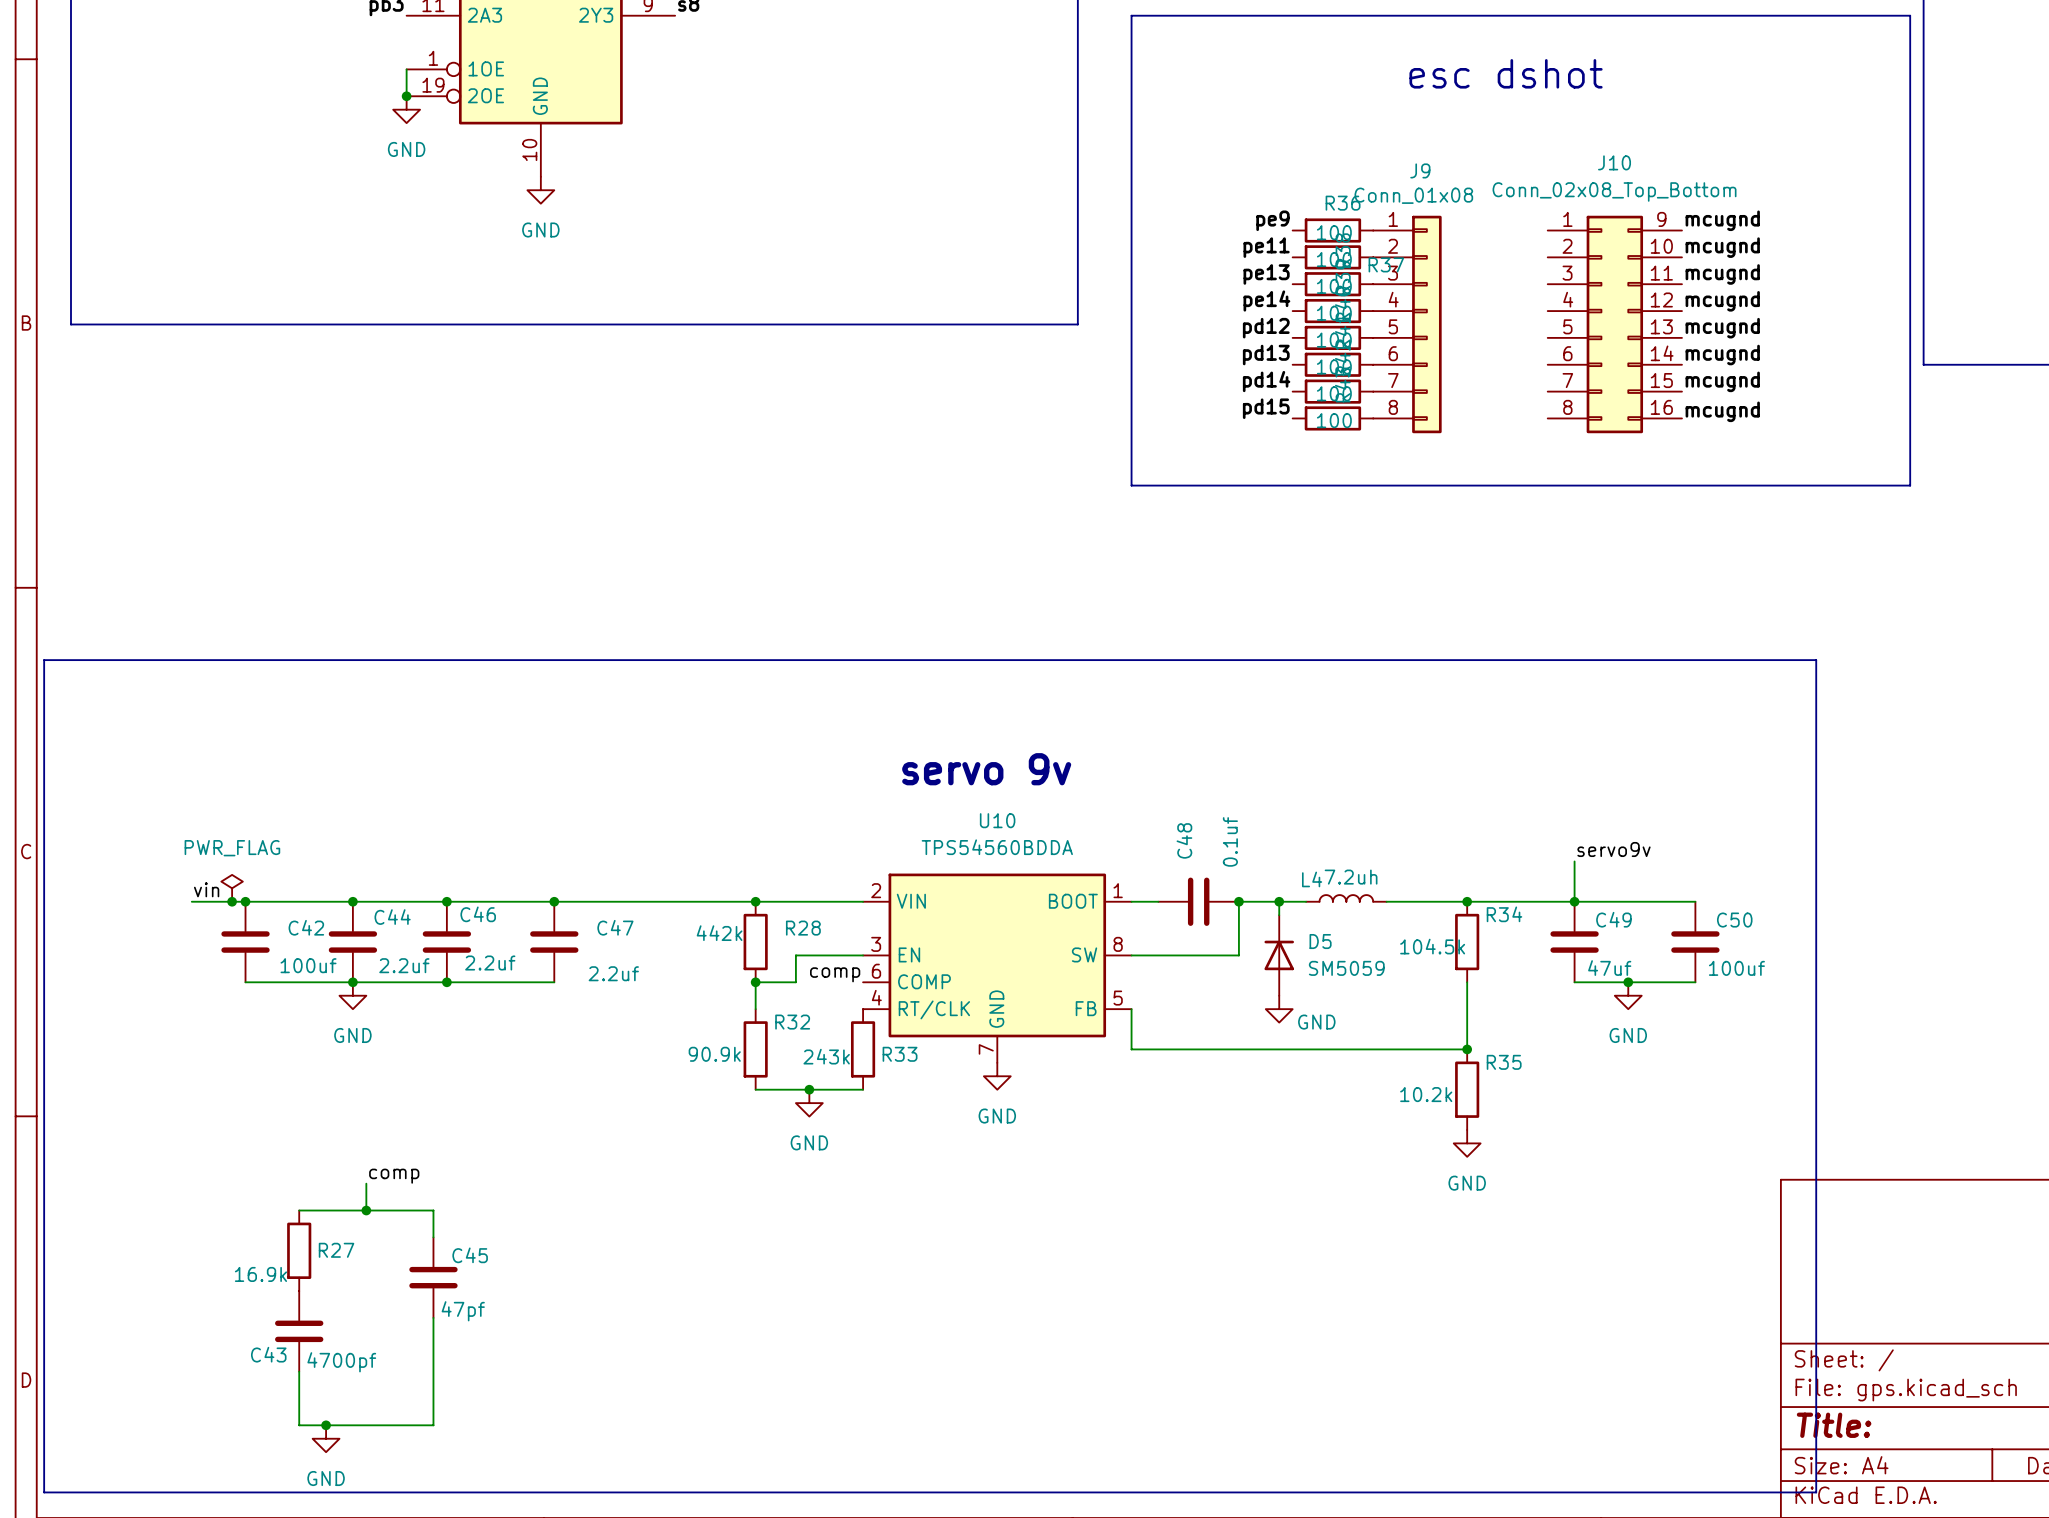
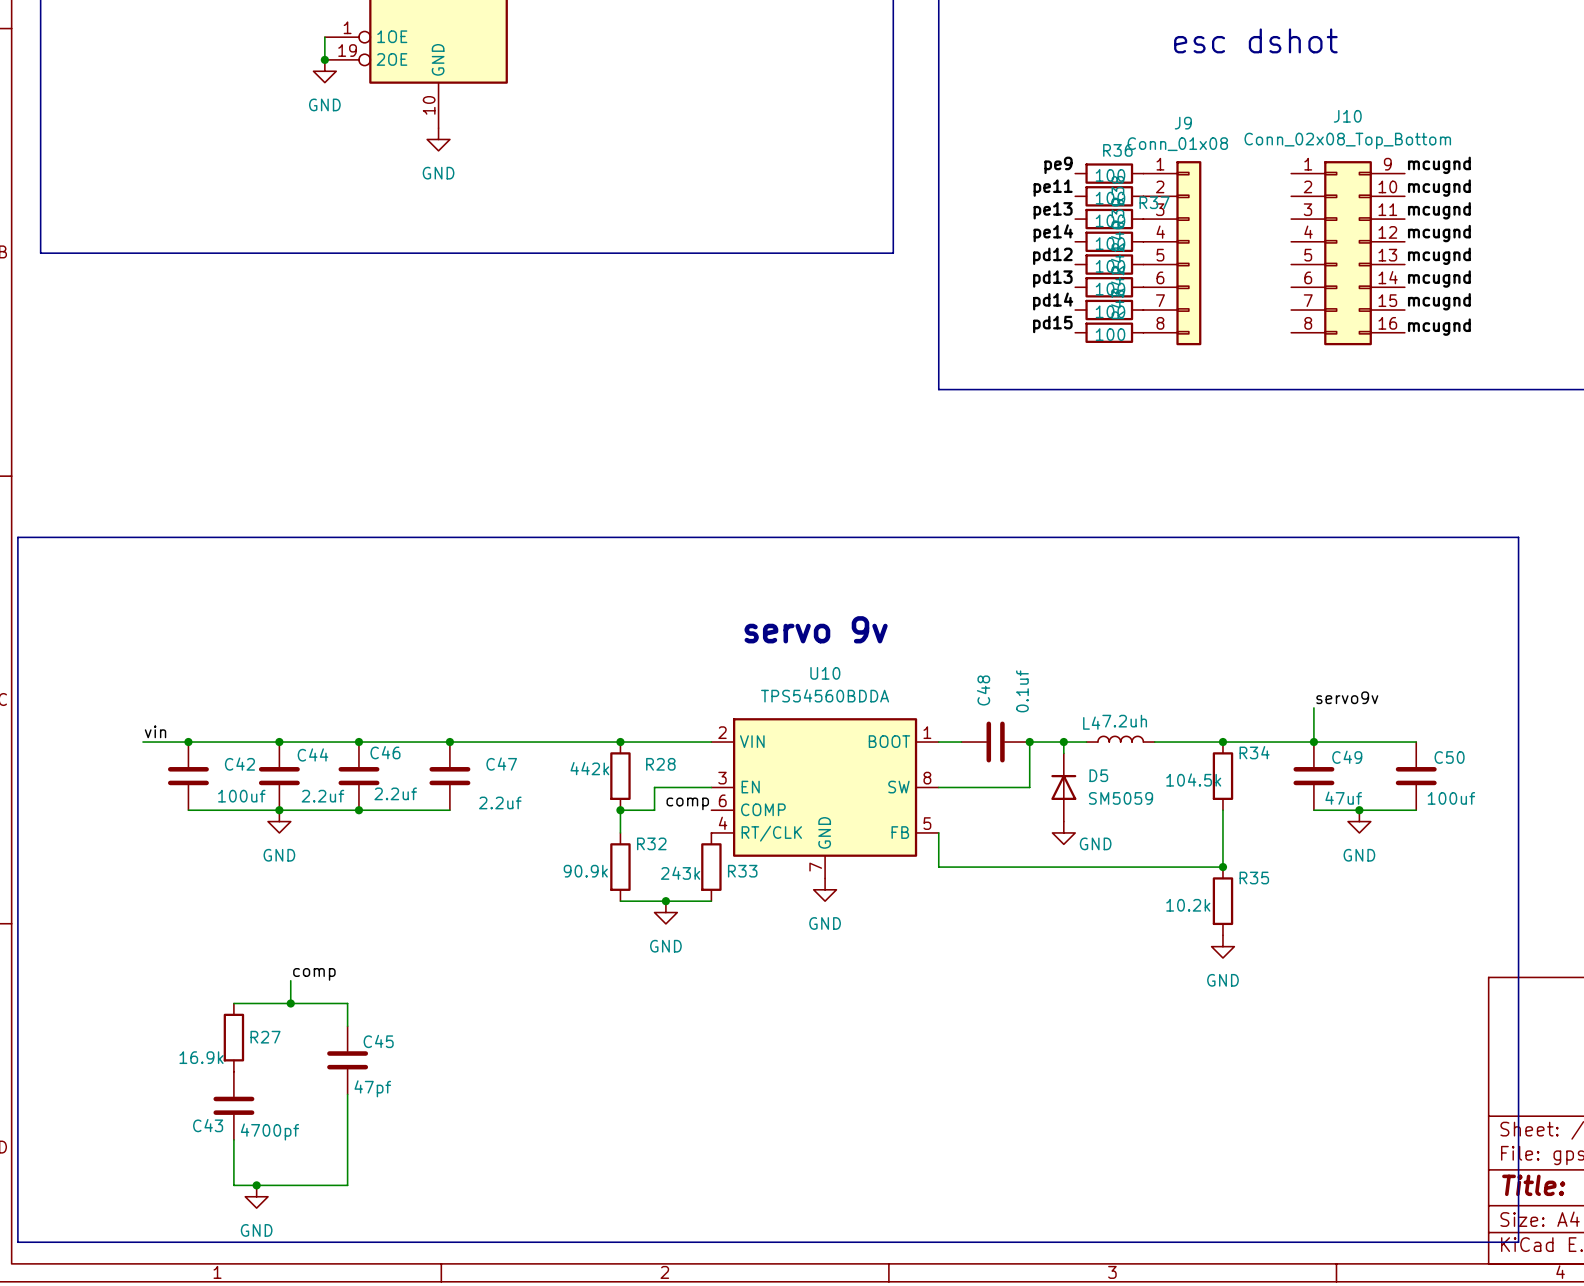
power symbol: PWR_FLAG (232, 888) -> none
junction: (232, 901) -> none

